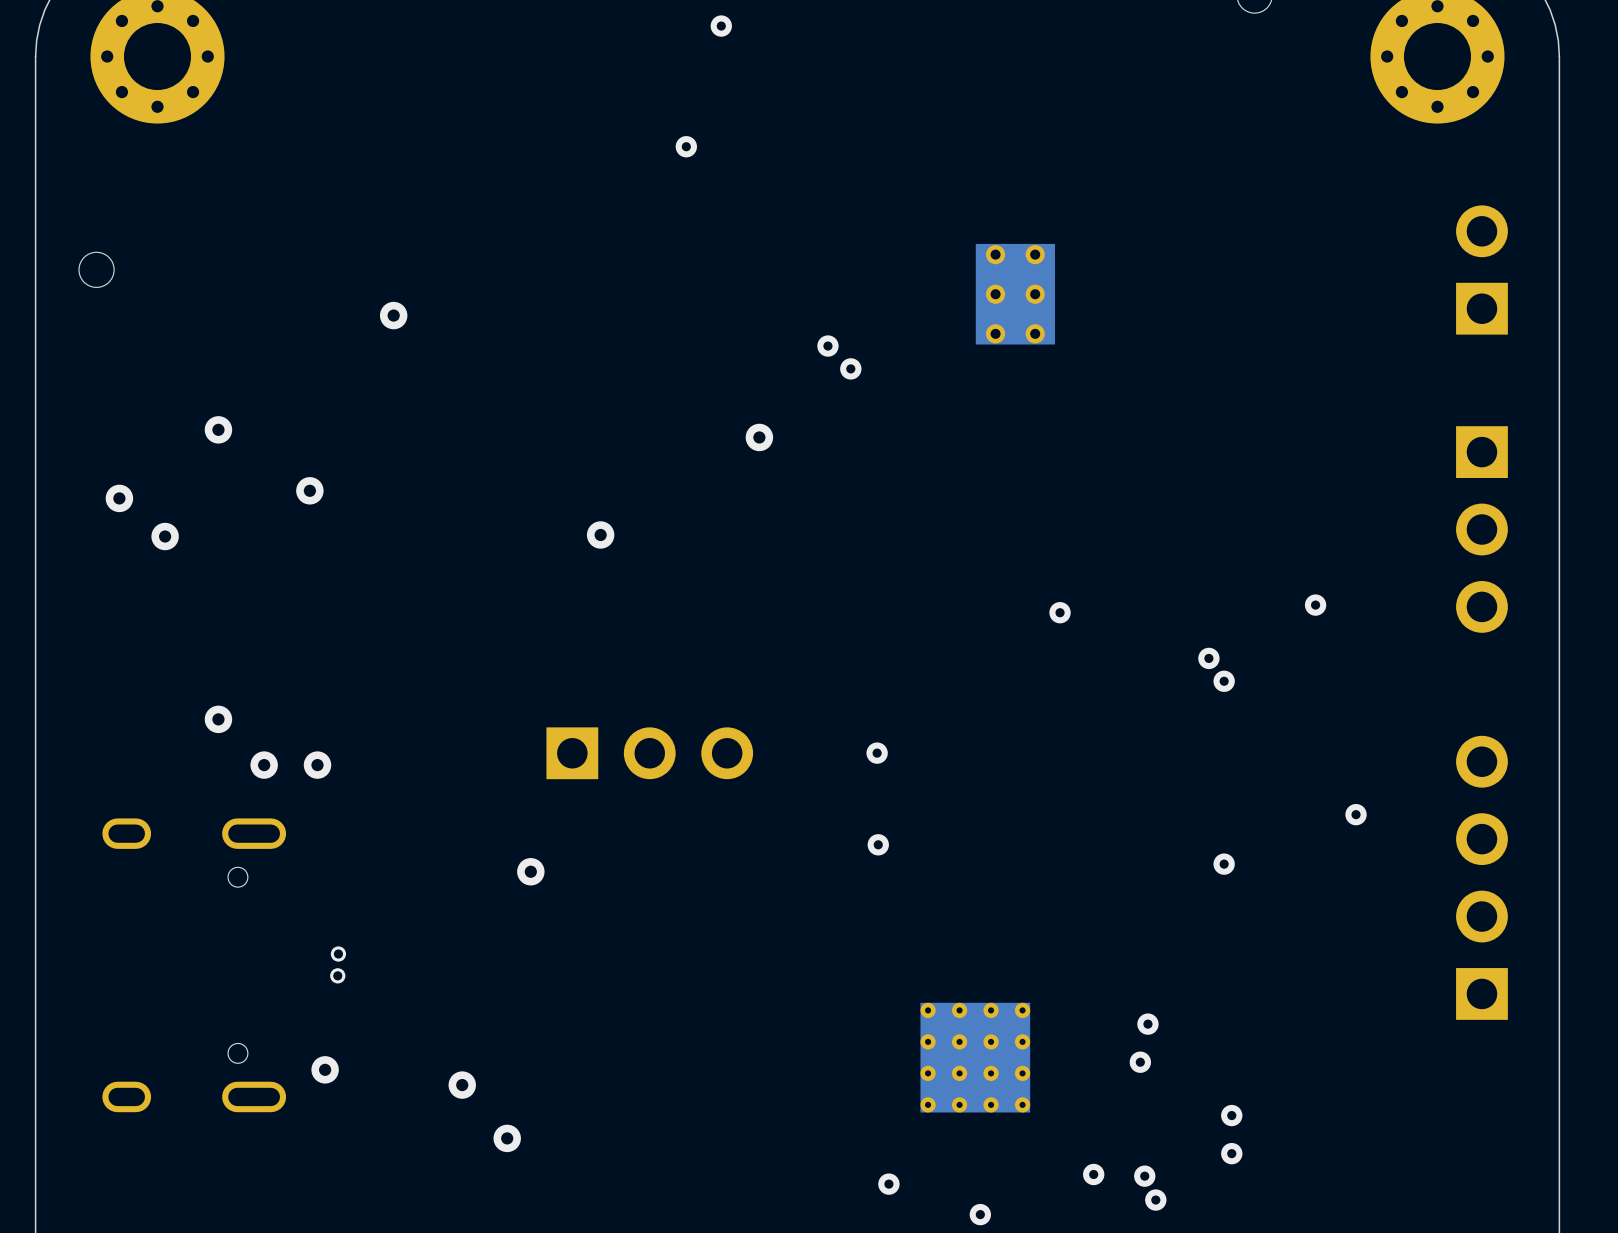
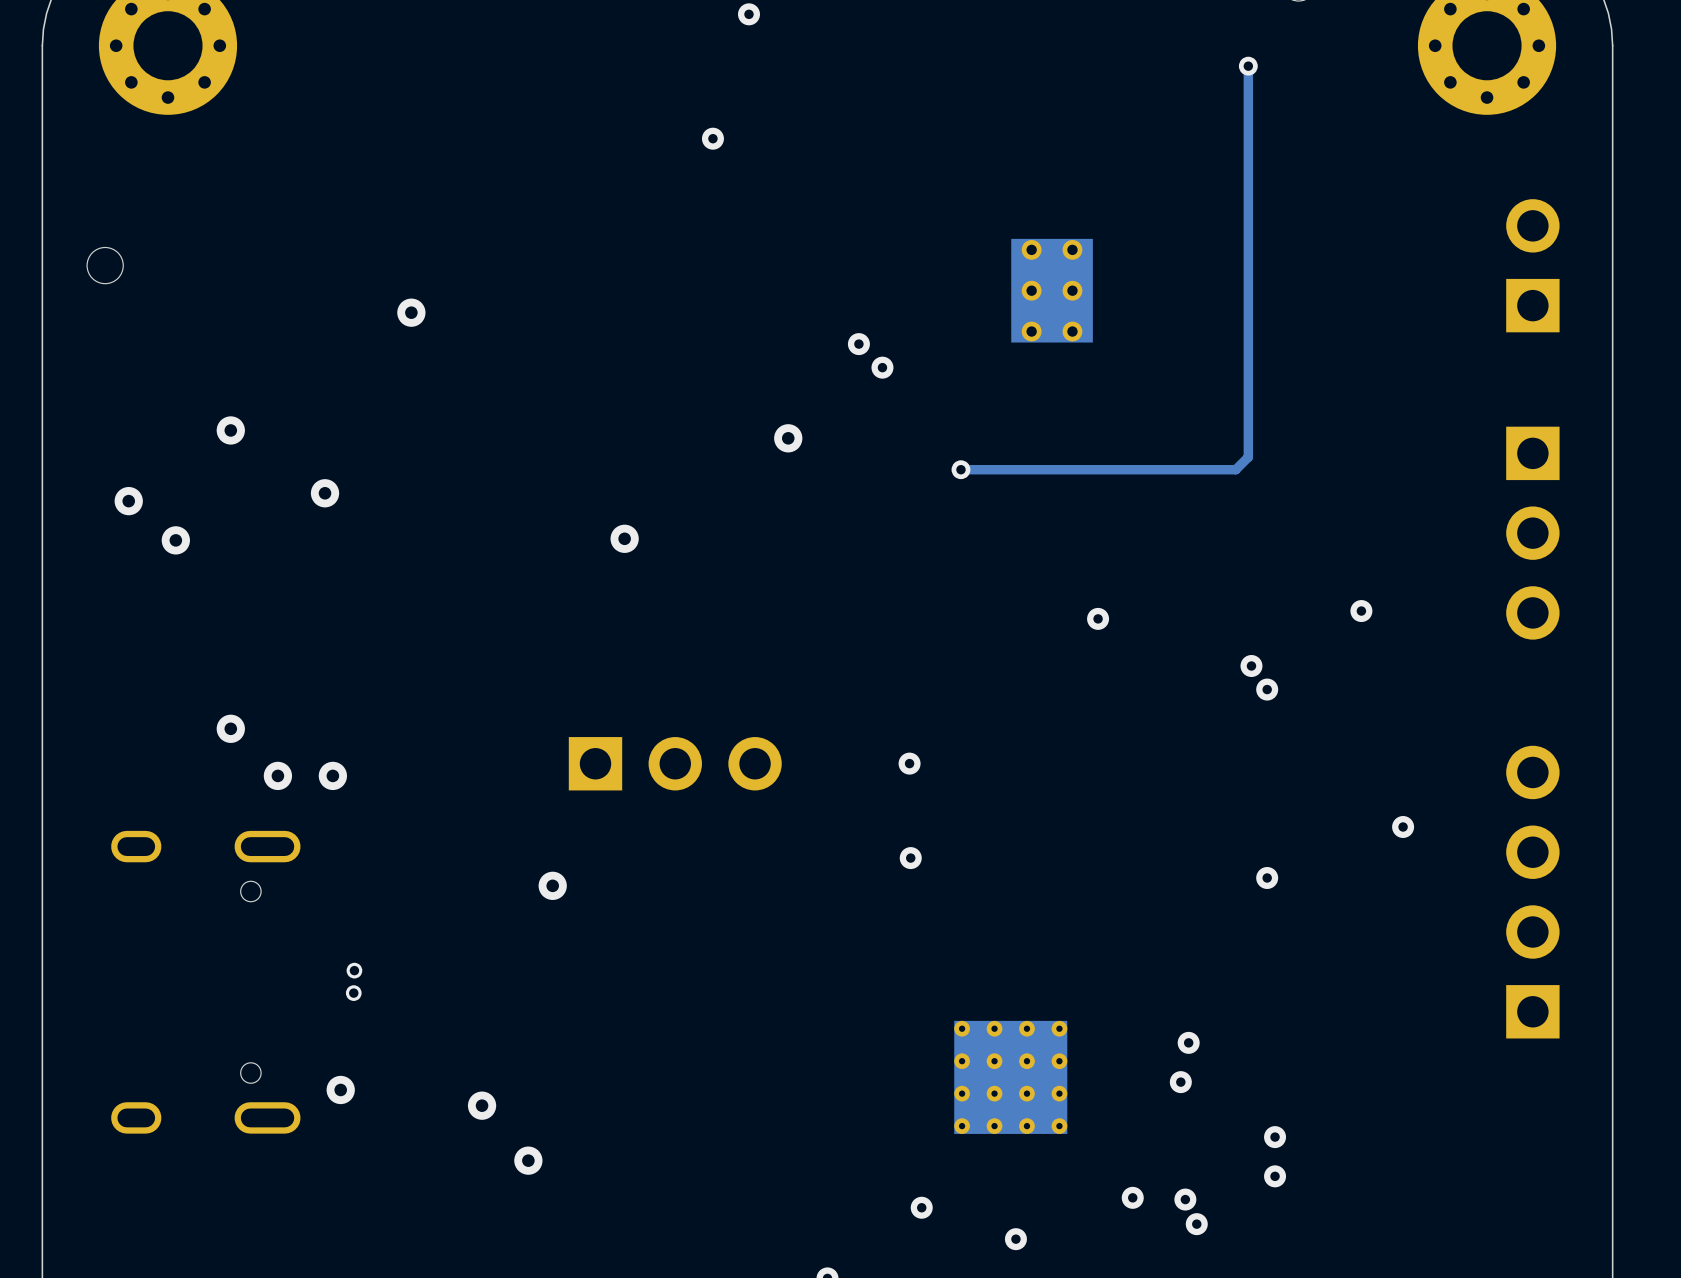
track: none -> (1248, 66) (1248, 457) (1235, 469) (960, 469)
via: none -> (1248, 66)
via: none -> (960, 469)

